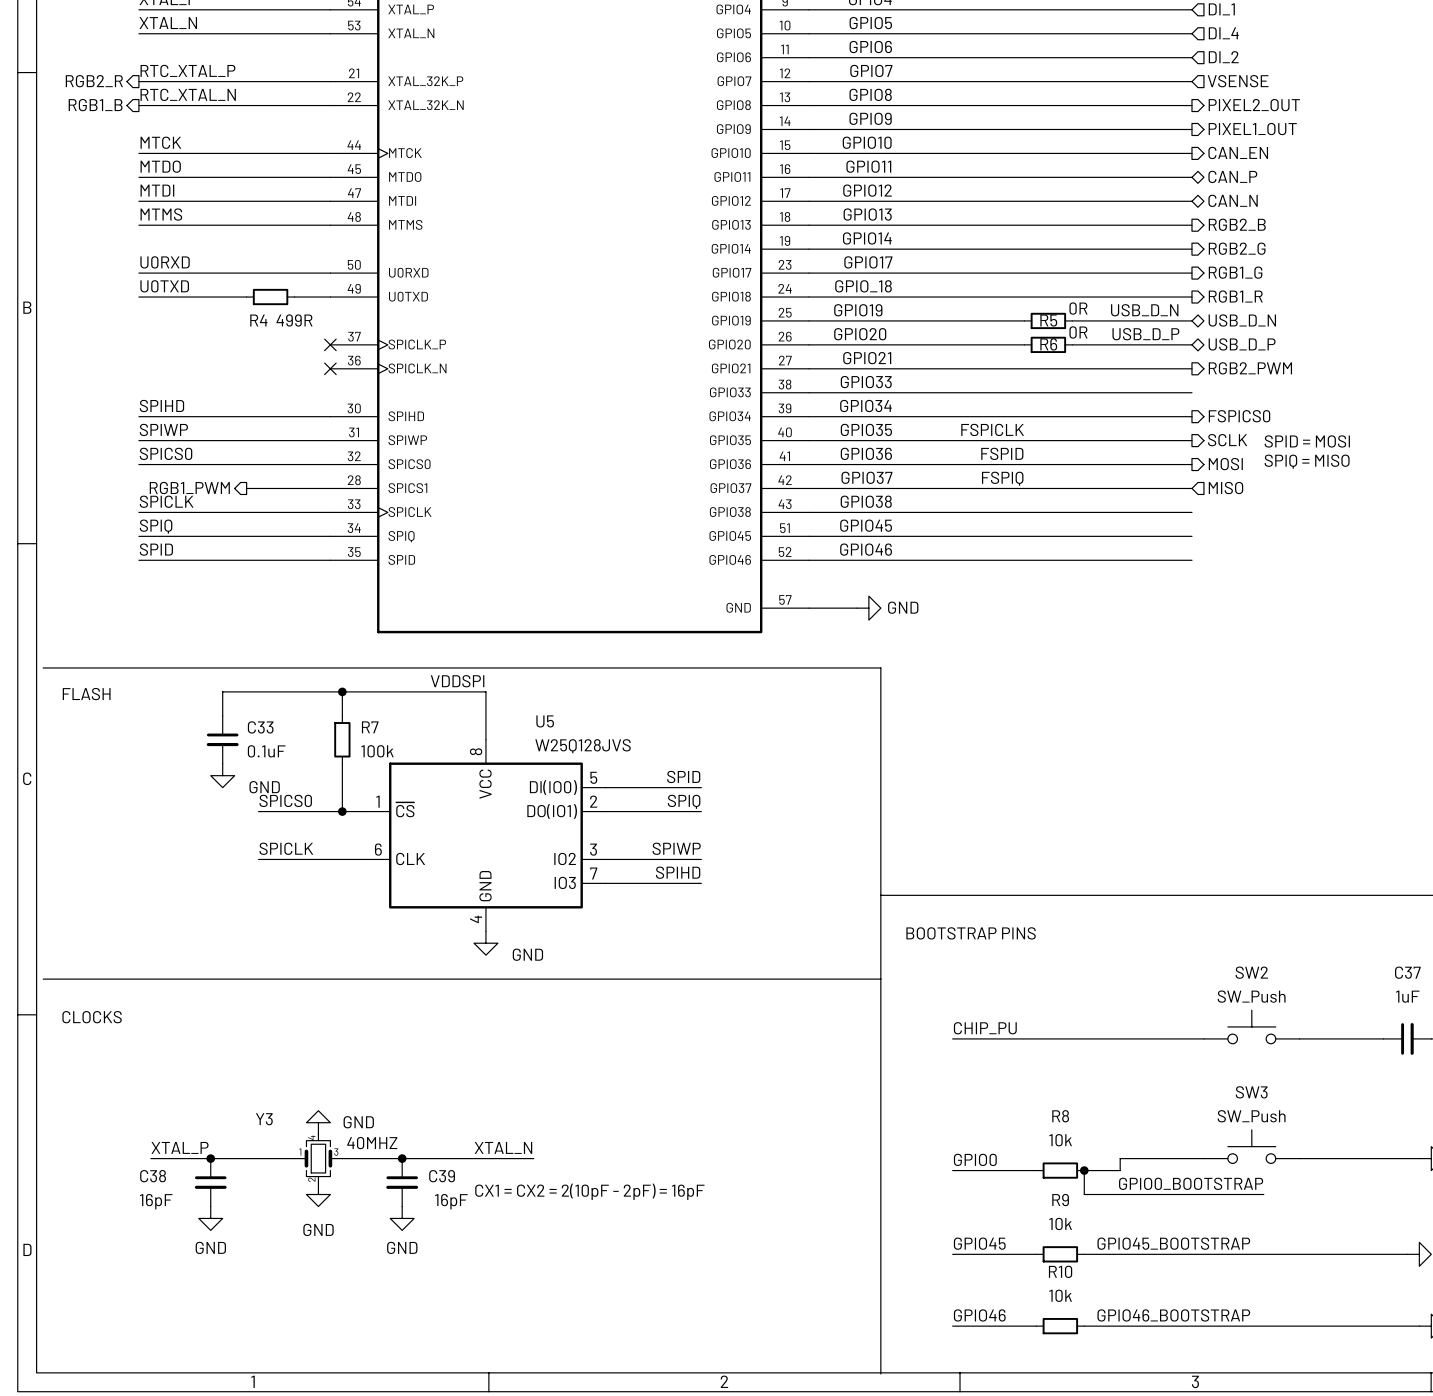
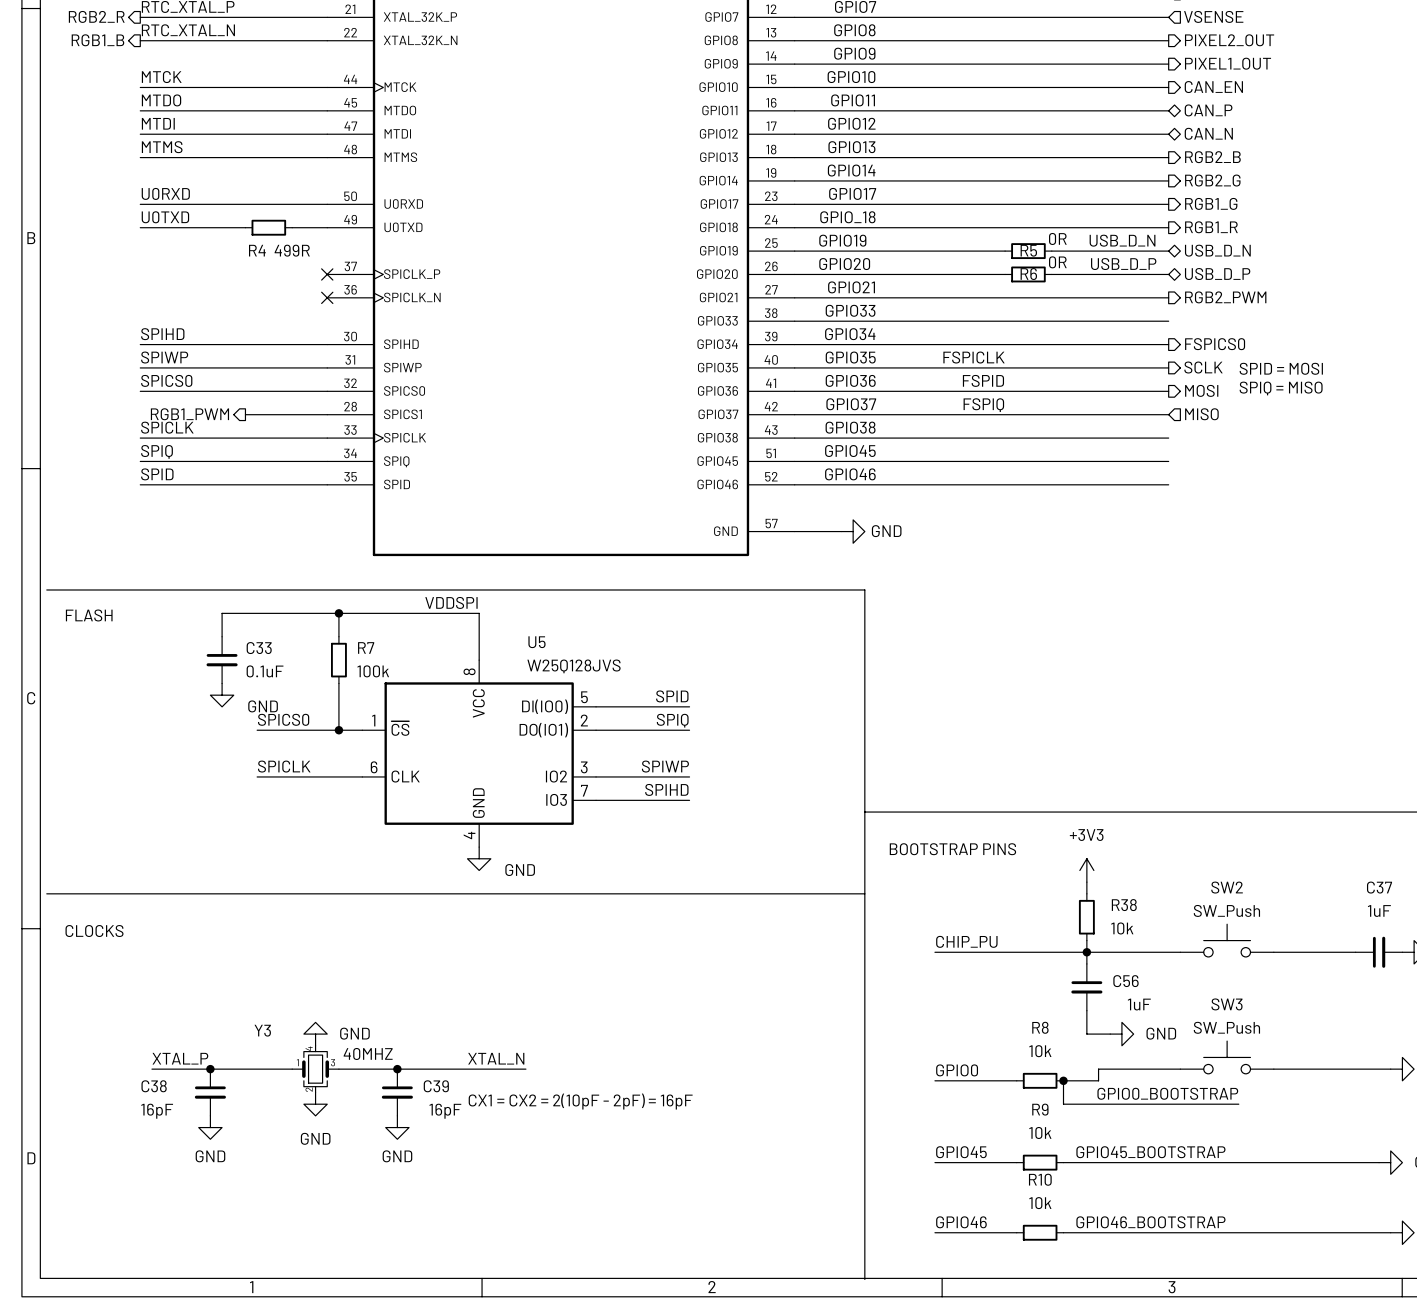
power symbol: none -> +3V3 (1086, 870)
wire: none -> (1086, 882) (1086, 893)
R38: none -> 10k (1086, 917)
wire: none -> (1086, 940) (1086, 963)
junction: none -> (1086, 952)
C56: none -> 1uF (1086, 987)
wire: none -> (1086, 1010) (1086, 1034) (1110, 1034)
power symbol: none -> GND (1121, 1034)

